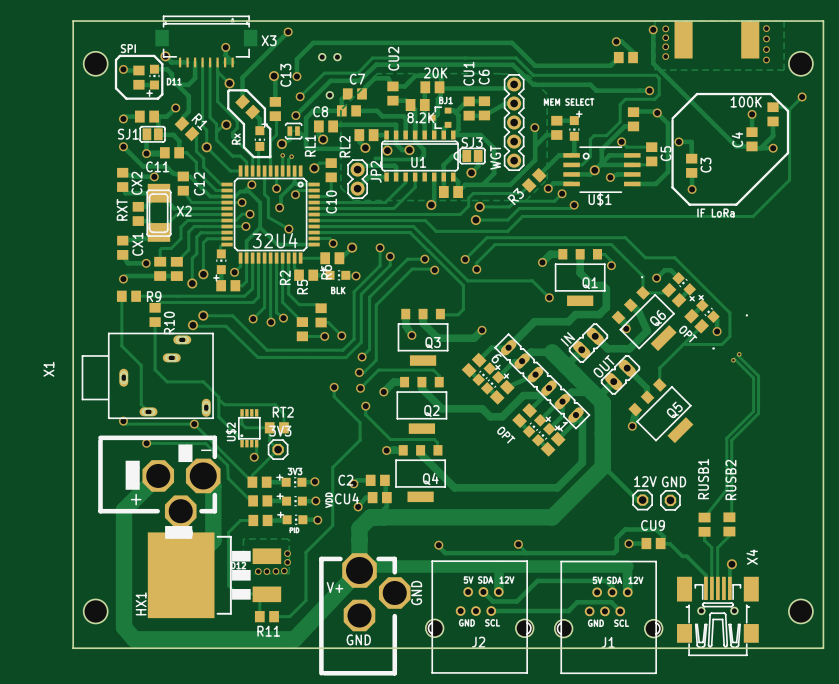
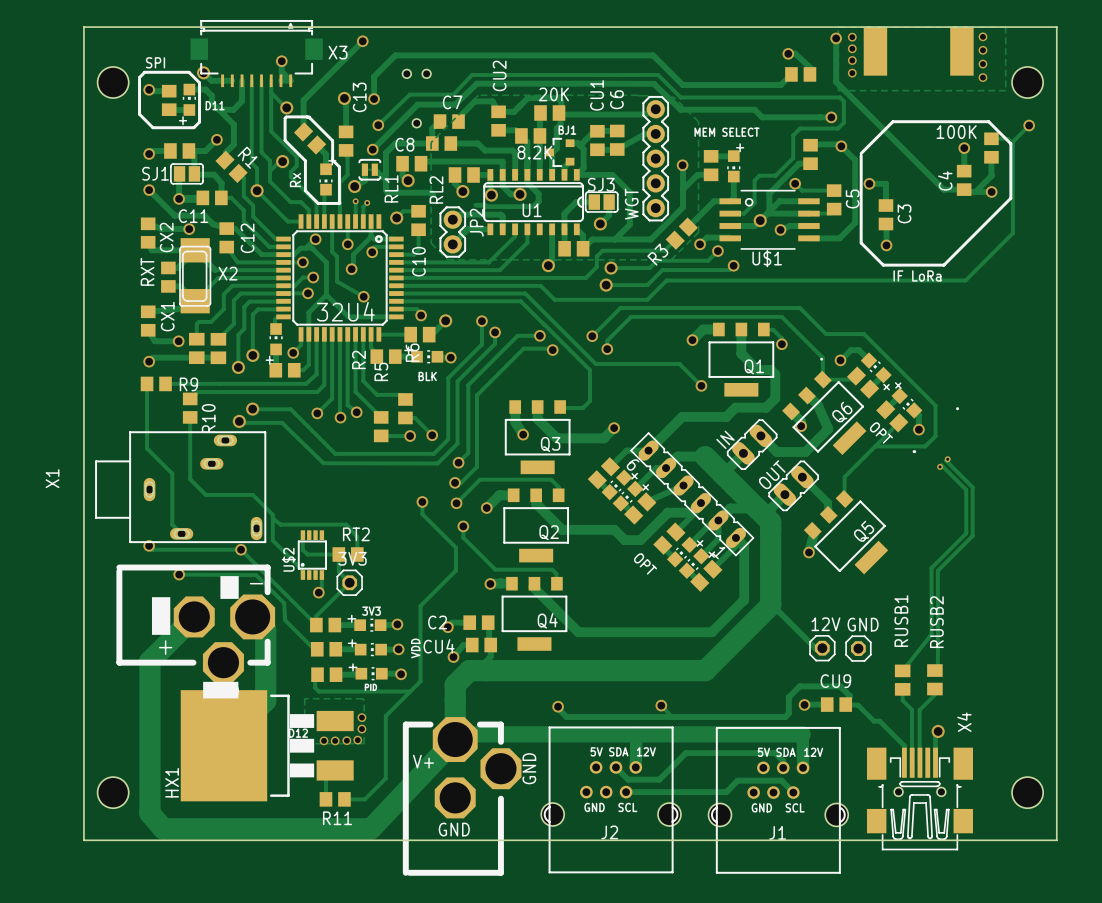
track: (253, 520) (240, 520) (228, 532) (228, 585) (236, 593) (266, 594) (264, 596) -> (317, 674) (315, 676) (315, 687) (318, 691) (410, 691)

